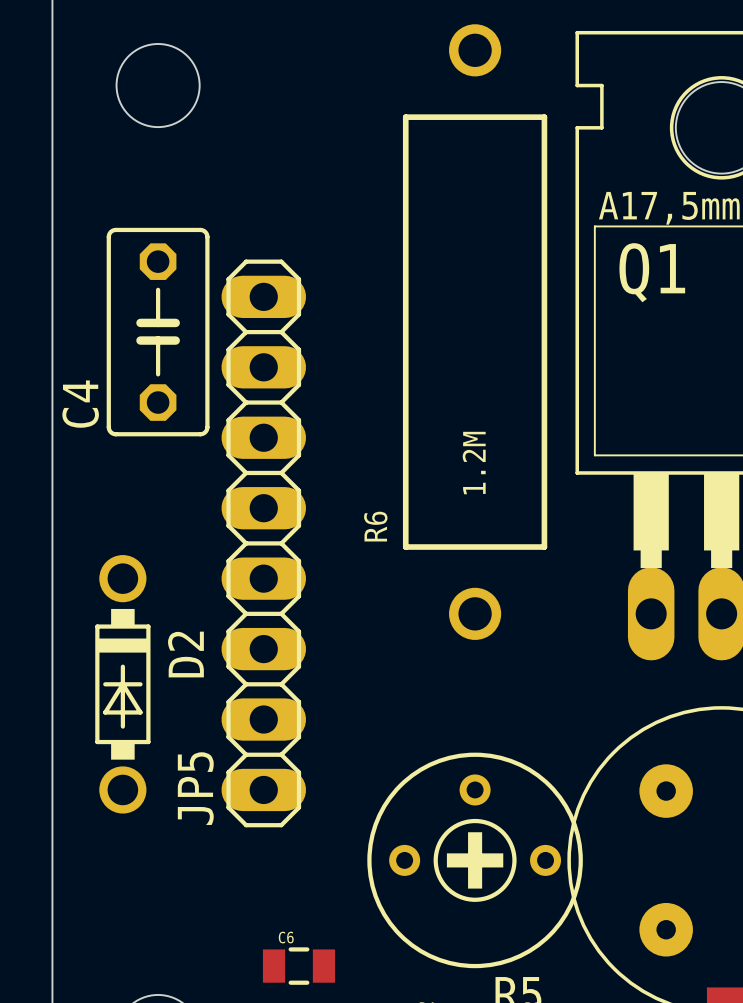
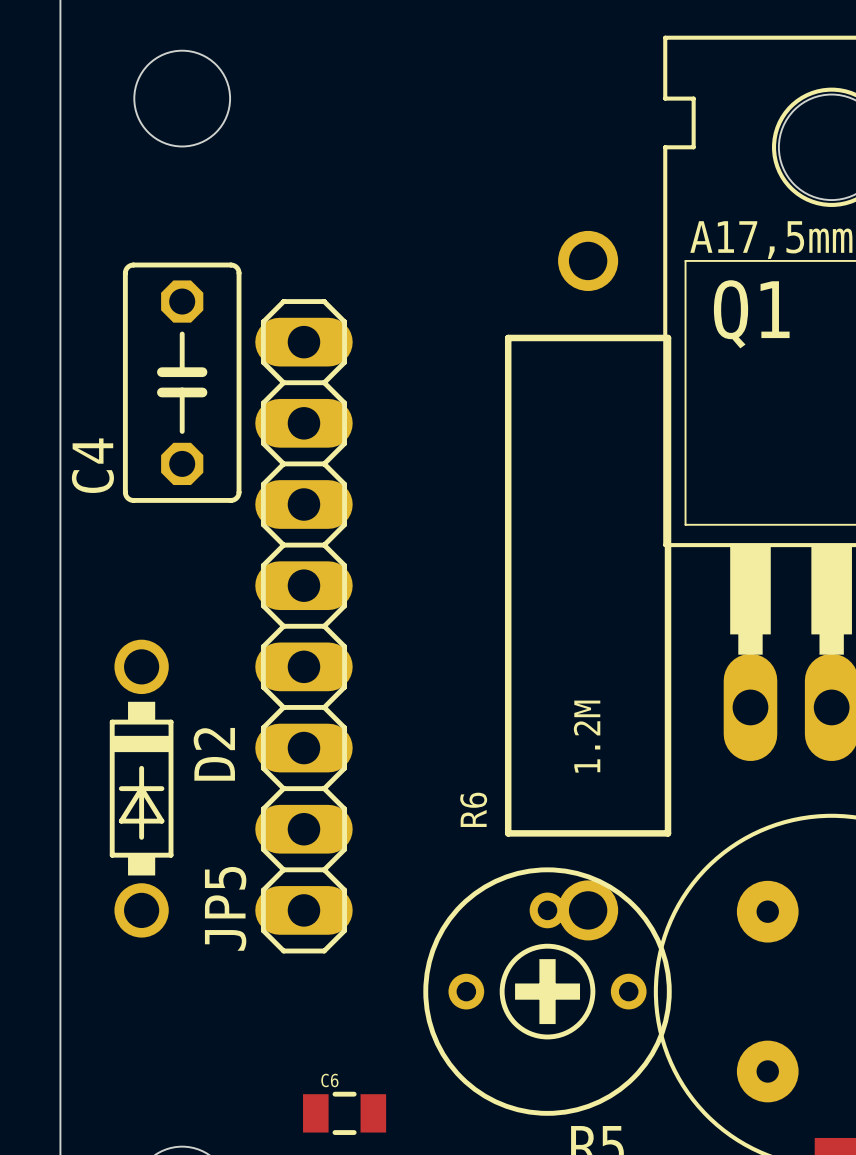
R6 position: (475, 332) -> (588, 585)

